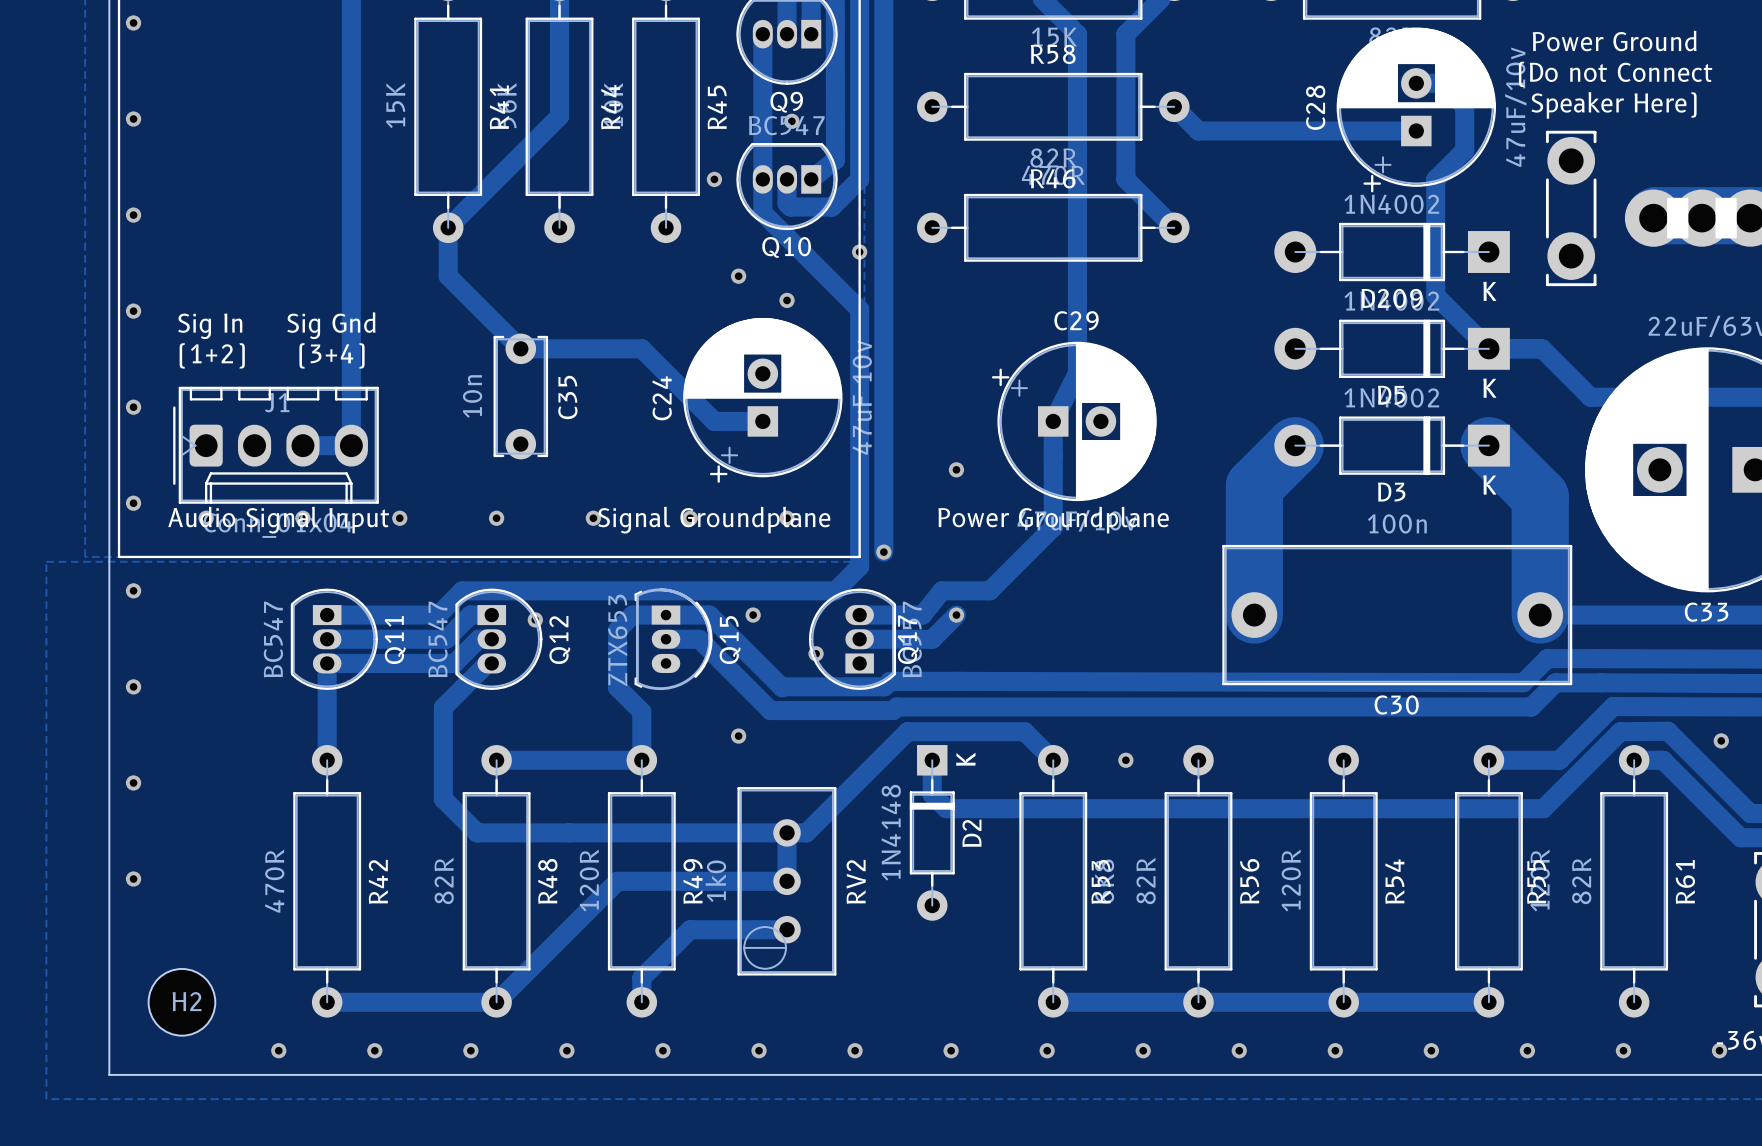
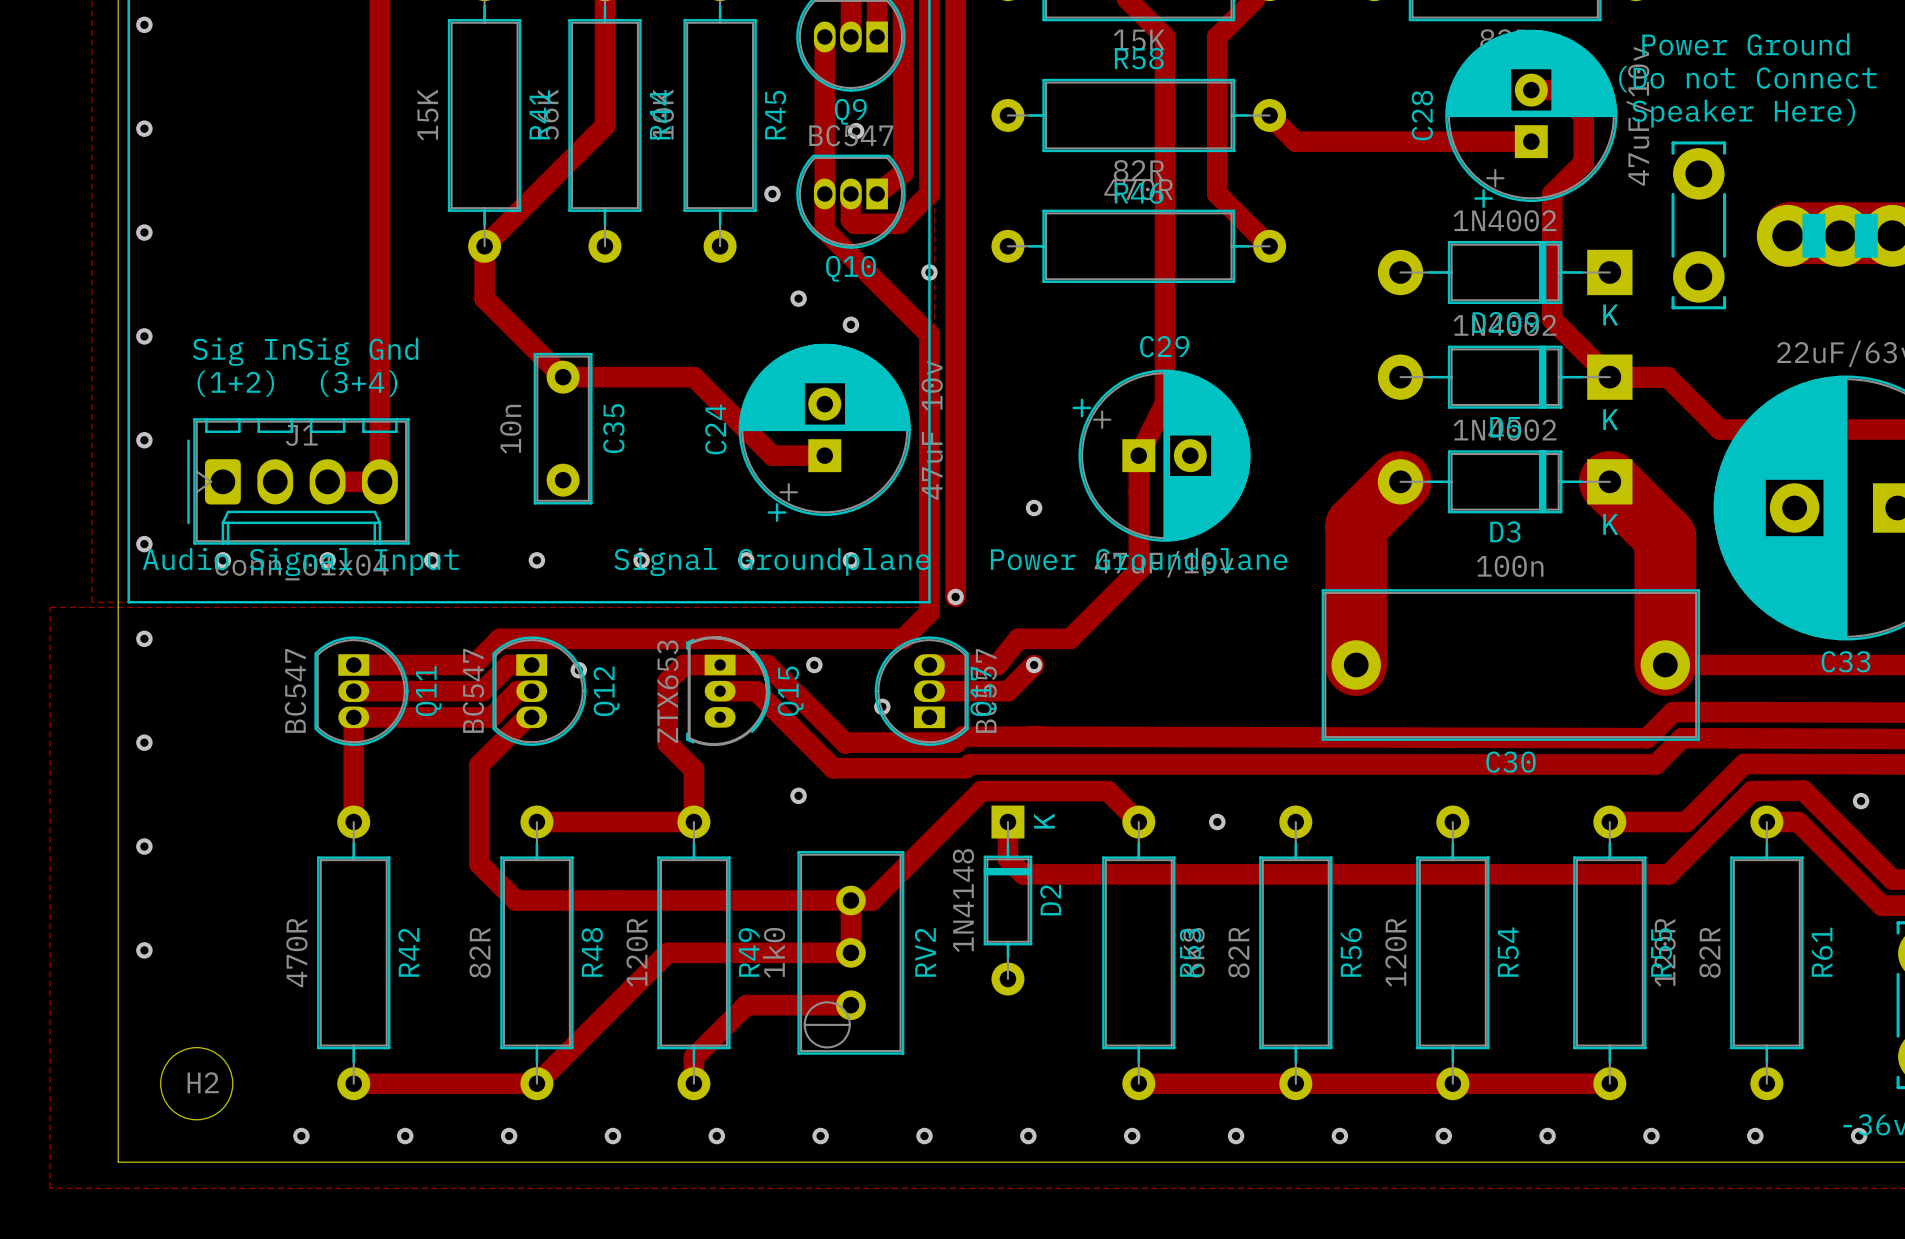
C35 footprint: [493, 333, 549, 460] -> [533, 352, 593, 505]

